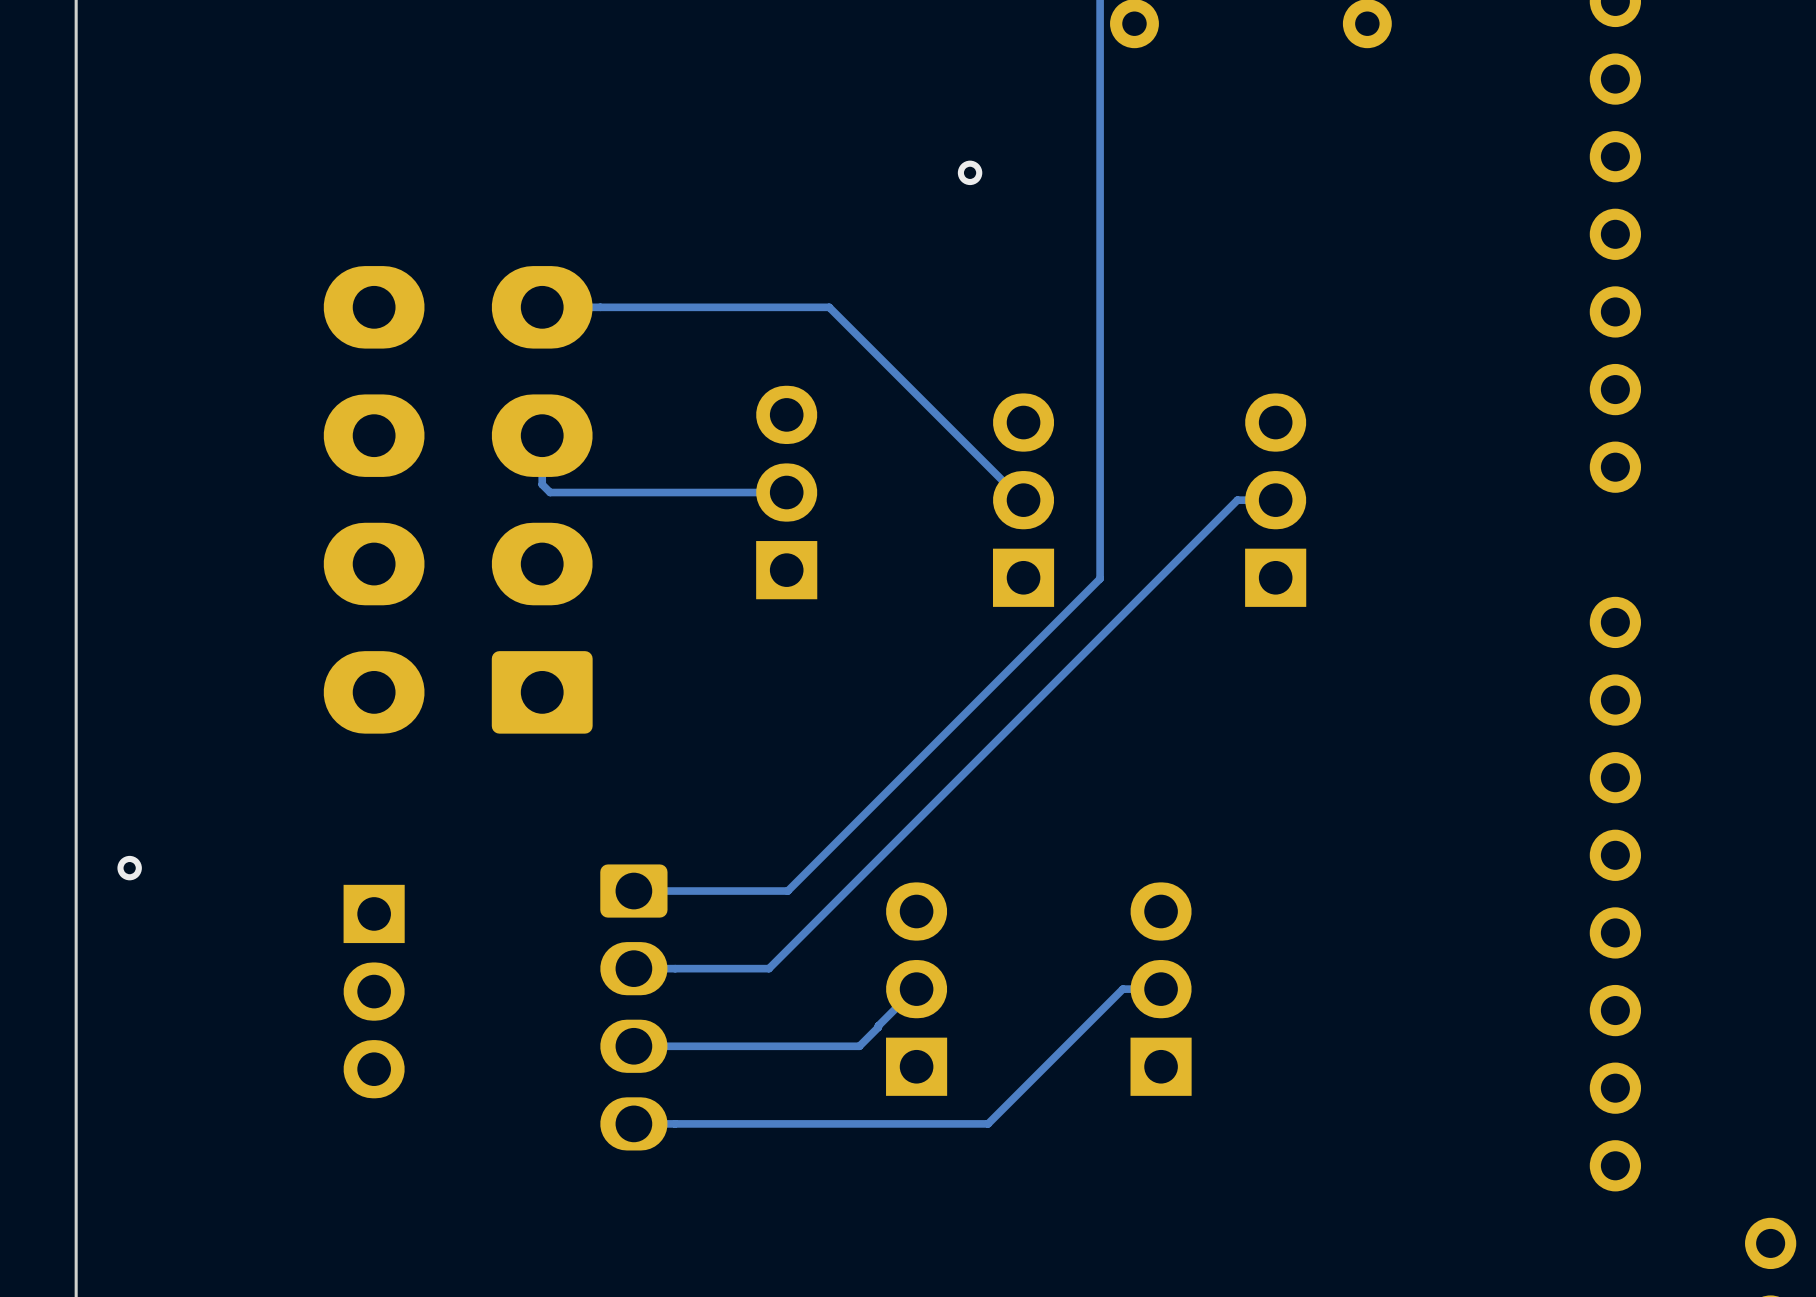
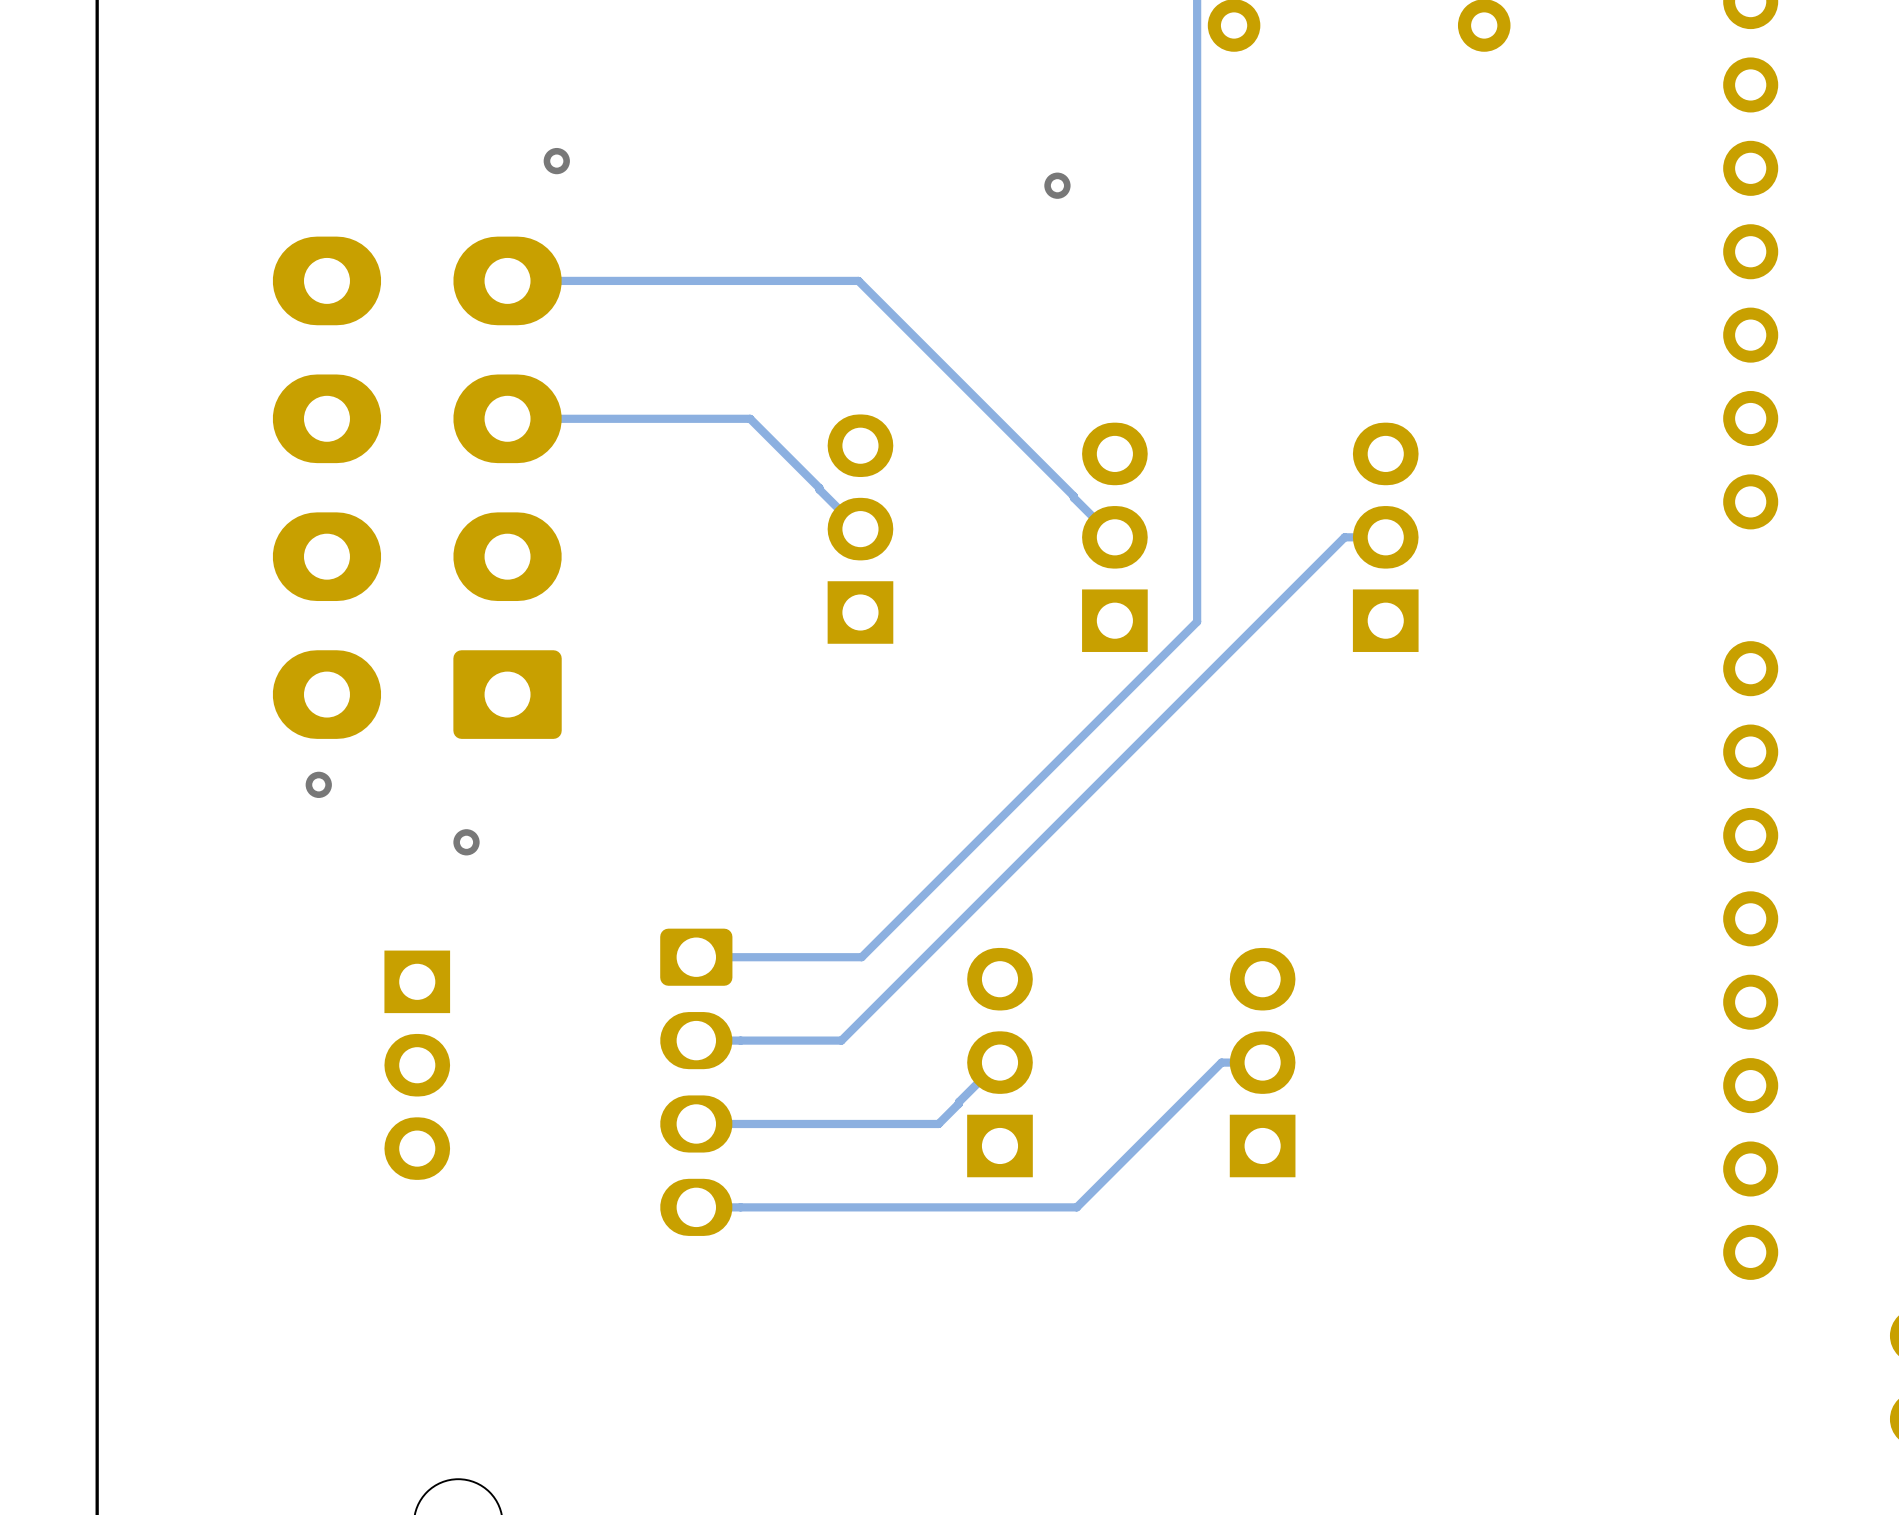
via: none -> (556, 161)
track: (542, 307) (829, 307) (985, 463) -> (507, 280) (858, 280) (1073, 497)
track: (542, 435) (542, 484) (550, 492) (785, 492) -> (507, 418) (750, 418) (858, 529)
part position: (458, 499) -> (417, 487)
via: none -> (318, 784)
via: none -> (466, 842)
via: (129, 868) -> none

